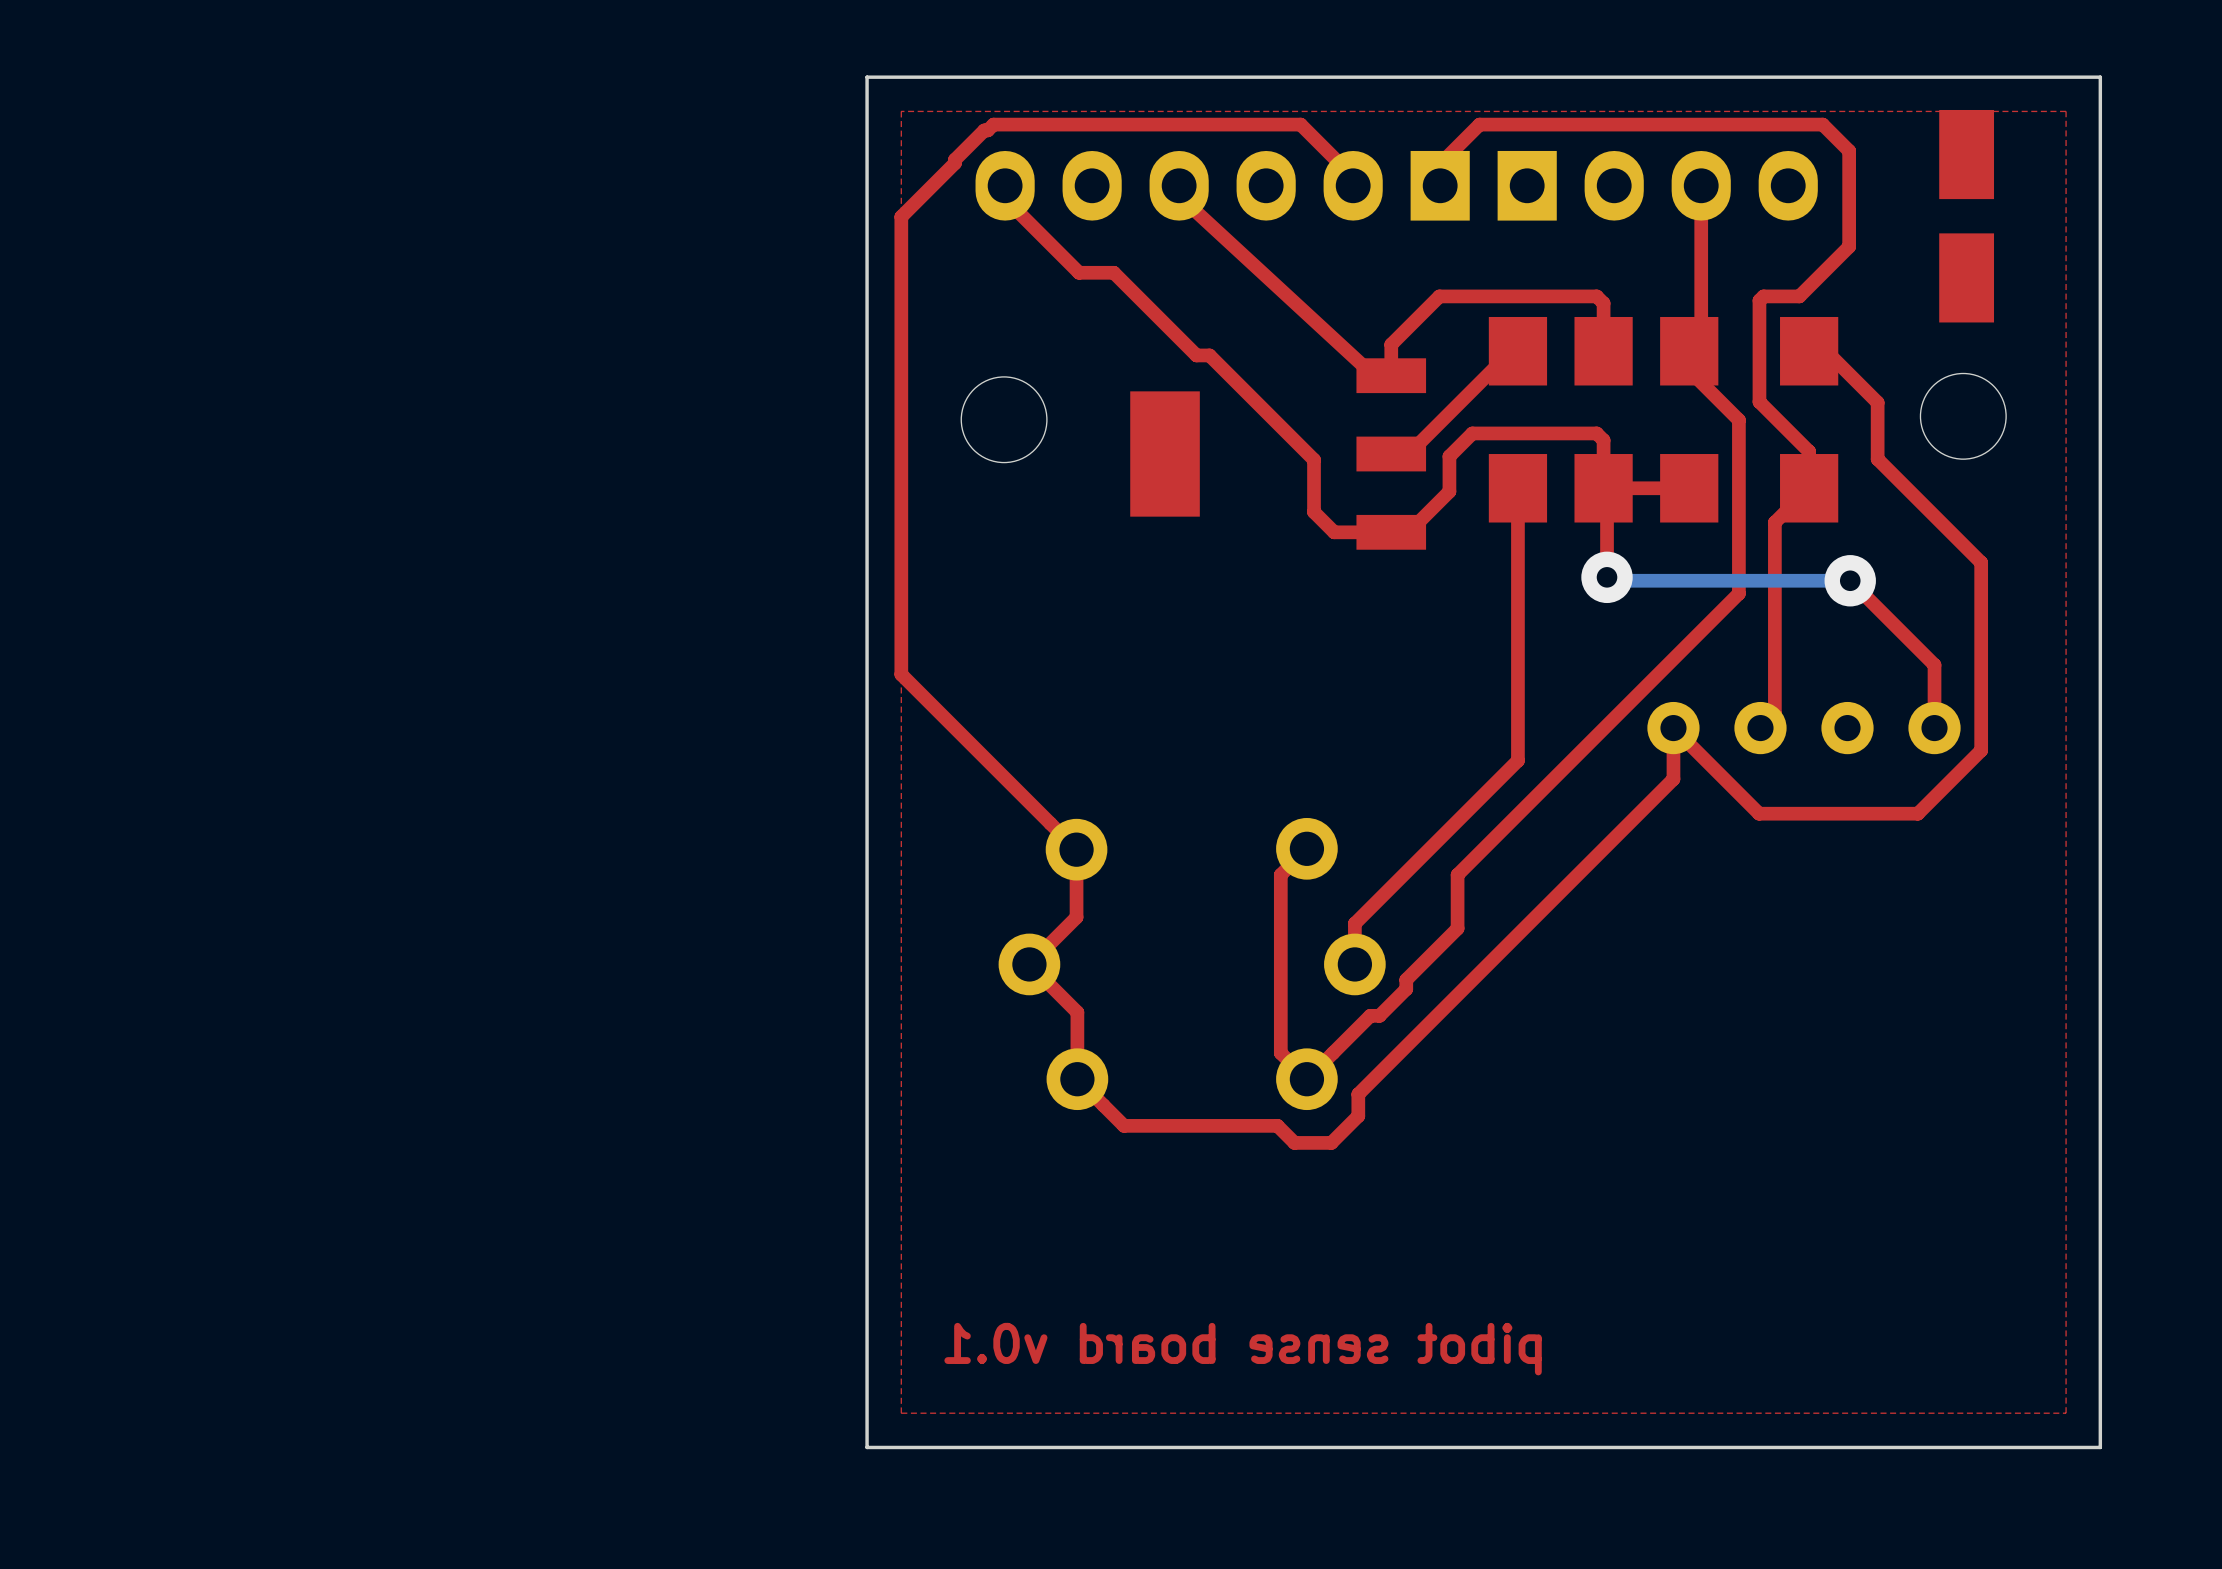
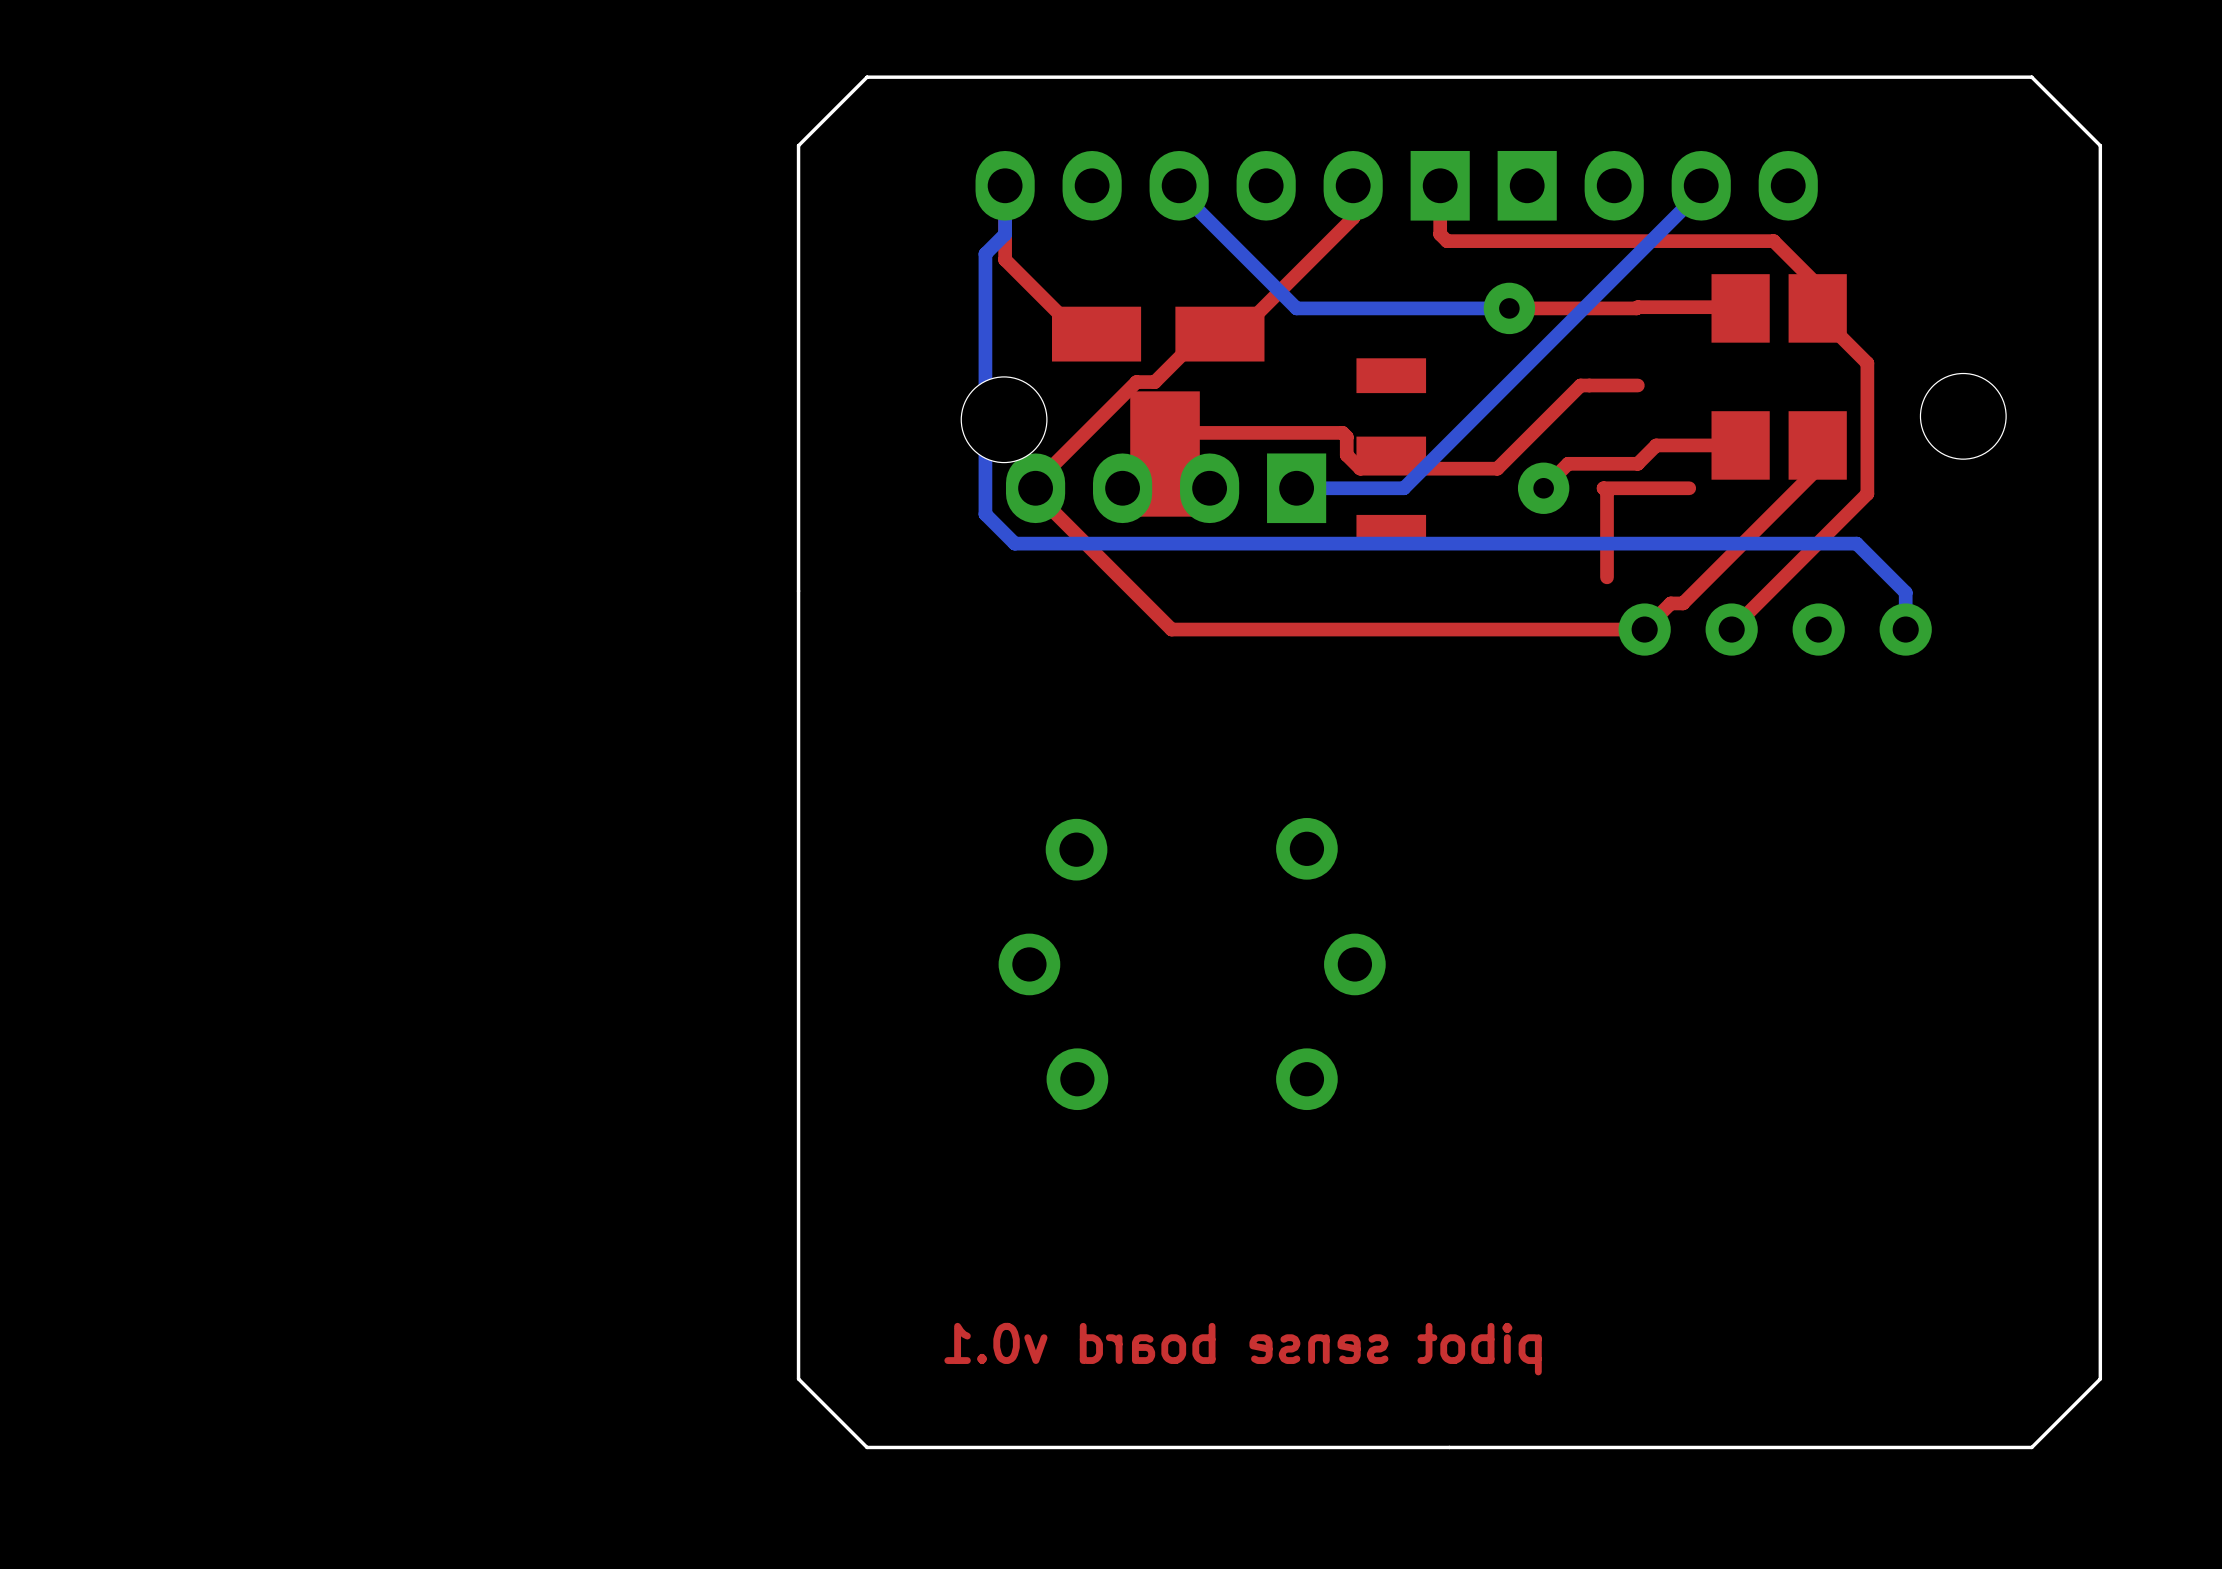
board edge: (867, 77) (867, 1447) -> (867, 77) (798, 145) (798, 1378) (867, 1447)
board edge: (2031, 77) (2100, 77) (2100, 145) -> (2031, 77) (2100, 145)
top zone outline: (2066, 111) (901, 111) (901, 1413) (2066, 1413) (2066, 111) -> none
bottom track: none -> (1005, 185) (1005, 234) (985, 253) (985, 514) (1014, 543) (1856, 543) (1905, 592) (1905, 629)
top track: (1179, 185) (1179, 196) (1373, 375) (1391, 375) (1391, 344) (1439, 296) (1596, 296) (1603, 303) (1603, 351) -> none
bottom track: none -> (1179, 185) (1179, 190) (1296, 308) (1509, 308)
top track: (1353, 185) (1353, 177) (1300, 124) (993, 124) (987, 130) (984, 130) (954, 159) (954, 163) (901, 216) (901, 674) (1076, 849) (1076, 917) (1029, 964) (1077, 1012) (1077, 1079) (1124, 1125) (1277, 1125) (1294, 1142) (1331, 1142) (1358, 1116) (1358, 1094) (1673, 779) (1673, 728) (1759, 813) (1917, 813) (1981, 750) (1981, 562) (1877, 459) (1877, 402) (1826, 351) (1809, 351) -> (1353, 185) (1353, 218) (1237, 334) (1202, 334) (1154, 382) (1136, 382) (1035, 483) (1035, 493) (1171, 629) (1644, 629) (1670, 603) (1683, 603) (1817, 468) (1817, 445)
top track: (1440, 185) (1440, 164) (1479, 124) (1822, 124) (1849, 150) (1849, 246) (1799, 296) (1763, 296) (1759, 300) (1759, 401) (1809, 451) (1809, 488) (1774, 522) (1774, 713) (1760, 728) -> (1440, 185) (1440, 234) (1447, 241) (1773, 241) (1817, 285) (1817, 313) (1867, 363) (1867, 493) (1731, 629)
top track: (1701, 185) (1701, 339) (1689, 351) (1689, 370) (1738, 420) (1738, 593) (1457, 874) (1457, 928) (1406, 979) (1406, 989) (1379, 1015) (1370, 1015) (1306, 1079) (1280, 1053) (1280, 874) (1306, 848) -> none
bottom track: none -> (1701, 185) (1701, 190) (1403, 488) (1296, 488)
top track: (1005, 198) (1079, 272) (1113, 272) (1196, 355) (1209, 355) (1314, 459) (1314, 512) (1334, 532) (1408, 532) (1449, 491) (1449, 456) (1472, 433) (1596, 433) (1603, 440) (1603, 488) -> (1005, 198) (1005, 259) (1079, 334) (1096, 334)
part rotation: 0° (1966, 216) -> 90° clockwise (1158, 334)
part position: (1966, 216) -> (1158, 334)
via: none -> (1509, 308)
top track: none -> (1740, 308) (1509, 308)
top track: (1517, 351) (1511, 351) (1408, 454) (1391, 454) -> none
part: none -> (1740, 376)
part: none -> (1817, 376)
top track: none -> (1637, 385) (1580, 385) (1497, 468) (1360, 468) (1346, 455) (1346, 437) (1342, 432) (1172, 432) (1122, 483) (1122, 488)
part: (1517, 419) -> none
part: (1603, 419) -> none
part: (1689, 419) -> none
part: (1809, 419) -> none
top track: none -> (1740, 445) (1656, 445) (1637, 463) (1568, 463) (1543, 488)
part: none -> (1166, 488)
top track: (1517, 488) (1517, 760) (1354, 923) (1354, 964) -> none
bottom track: (1607, 577) (1610, 580) (1850, 580) -> none
via position: (1607, 577) -> (1543, 488)
top track: (1850, 580) (1934, 665) (1934, 728) -> none
via: (1850, 580) -> none
part position: (1803, 728) -> (1775, 629)
board edge: (2100, 1378) (2100, 1447) (2031, 1447) -> (2100, 1378) (2031, 1447)

